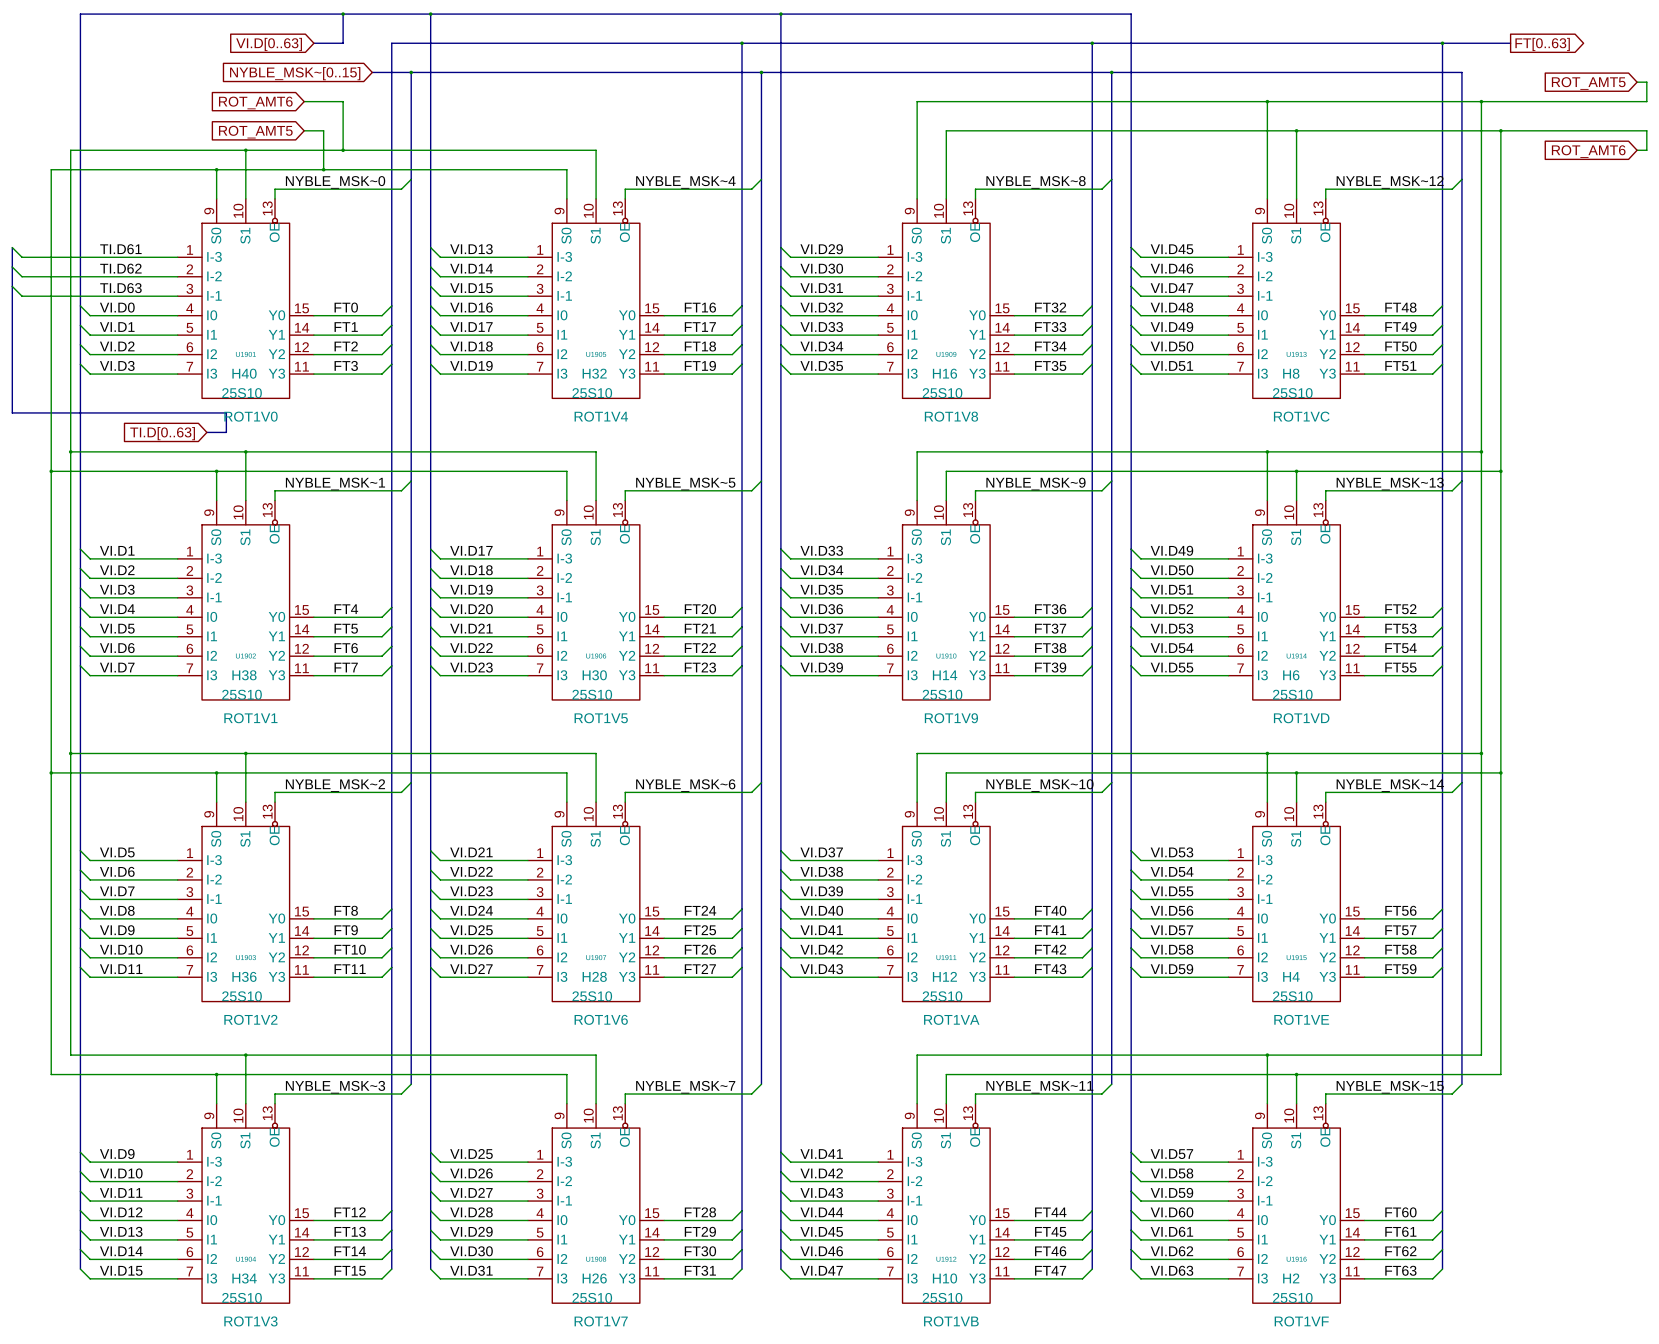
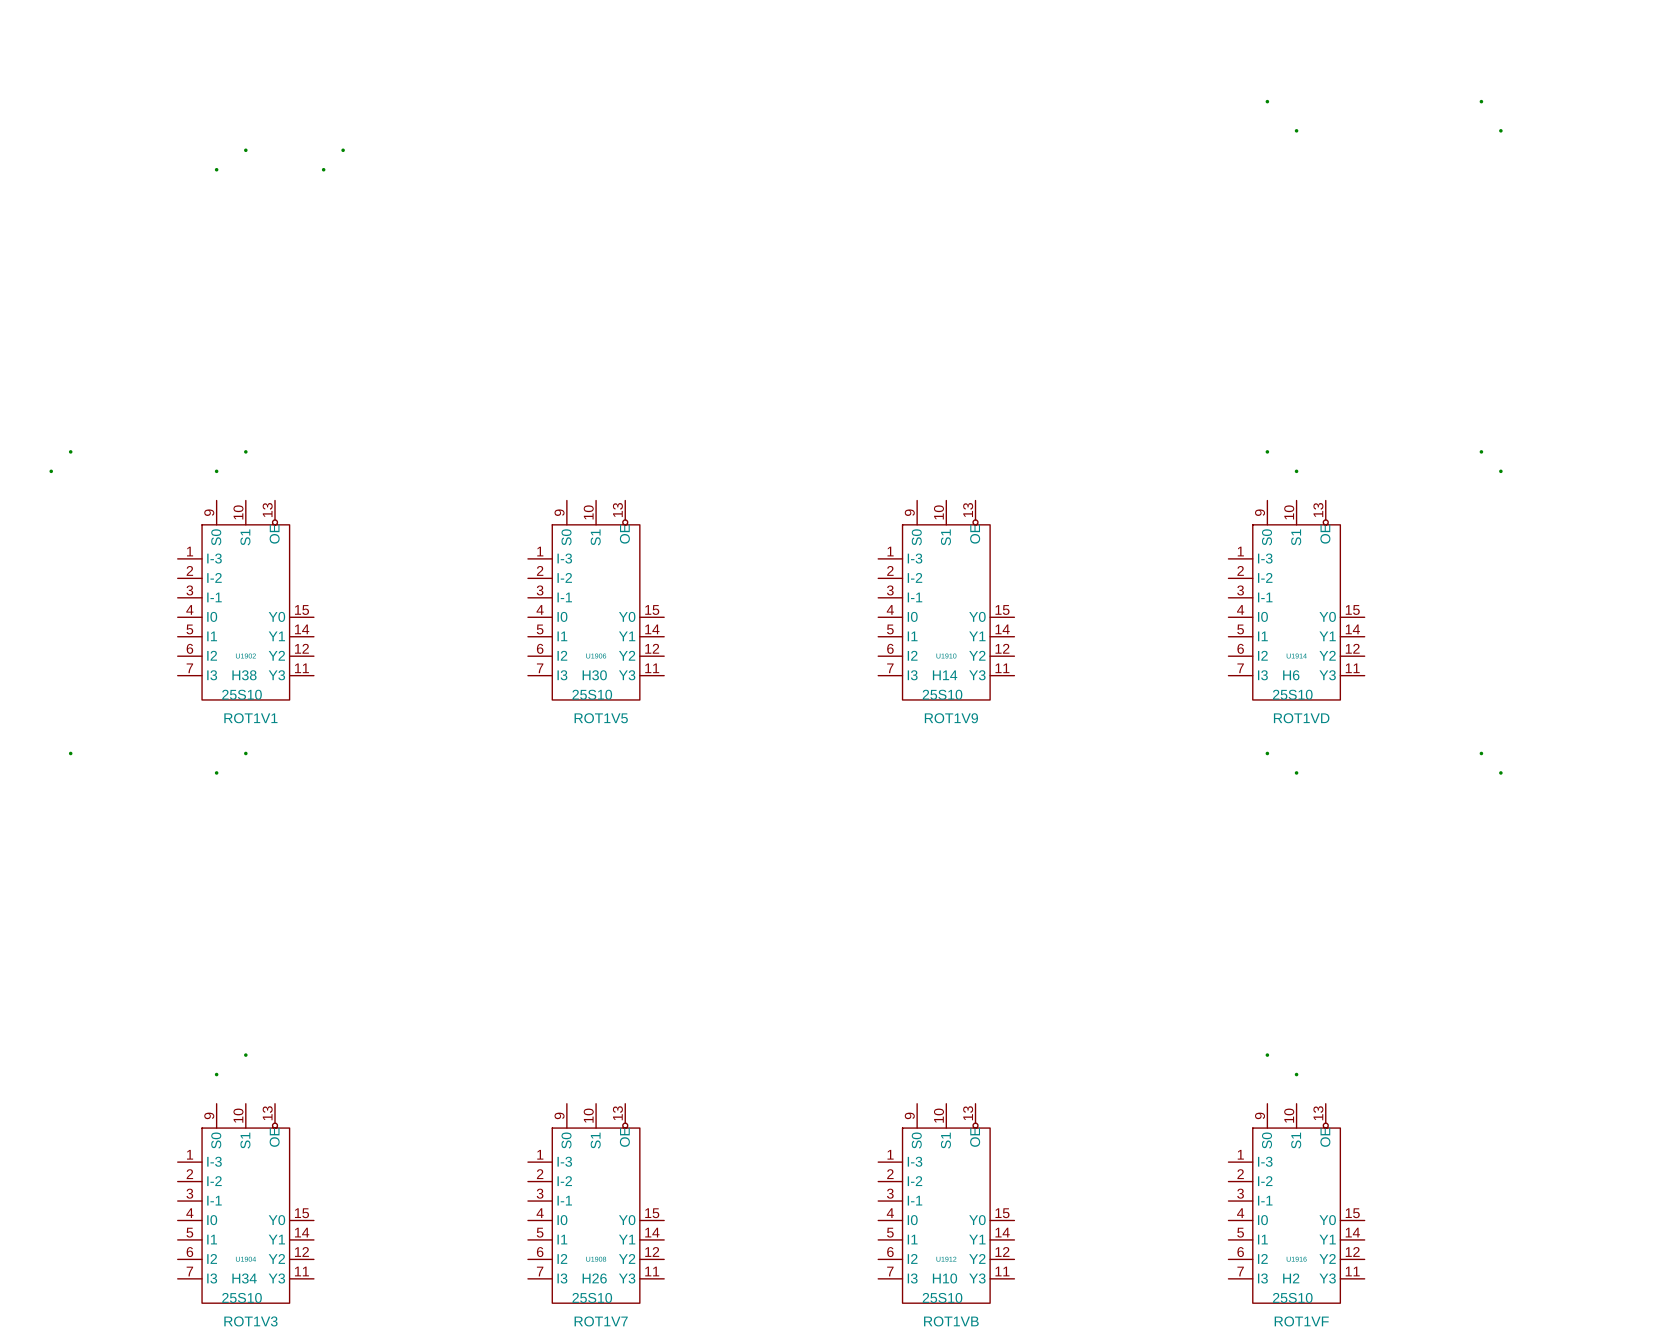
bus: (343, 14) (343, 43) (313, 43) -> none
junction: (343, 14) -> none
bus: (430, 14) (430, 1269) -> none
junction: (430, 14) -> none
bus: (780, 14) (780, 1269) -> none
junction: (780, 14) -> none
bus: (742, 43) (742, 1269) -> none
junction: (742, 43) -> none
bus: (1092, 43) (1092, 1269) -> none
junction: (1092, 43) -> none
bus: (1442, 43) (1442, 1269) -> none
junction: (1442, 43) -> none
bus: (1510, 43) (391, 43) (391, 1269) -> none
global label: VI.D[0..63] (269, 44) -> none
global label: FT[0..63] (1542, 44) -> none
bus: (372, 72) (1461, 72) (1461, 1084) -> none
bus: (411, 72) (411, 1084) -> none
junction: (411, 72) -> none
bus: (761, 72) (761, 1084) -> none
junction: (761, 72) -> none
bus: (1111, 72) (1111, 1084) -> none
junction: (1111, 72) -> none
global label: NYBLE_MSK~[0..15] (295, 73) -> none
wire: (1637, 82) (1646, 82) (1646, 101) (917, 101) (917, 198) -> none
global label: ROT_AMT5 (1588, 83) -> none
wire: (304, 101) (343, 101) (343, 150) -> none
wire: (1267, 101) (1267, 198) -> none
wire: (1481, 101) (1481, 1055) (917, 1055) (917, 1103) -> none
global label: ROT_AMT6 (255, 102) -> none
wire: (304, 130) (323, 130) (323, 169) -> none
wire: (1296, 130) (1296, 198) -> none
wire: (1500, 130) (1500, 1074) (946, 1074) (946, 1103) -> none
global label: ROT_AMT5 (255, 132) -> none
wire: (245, 150) (245, 198) -> none
wire: (1637, 150) (1646, 150) (1646, 130) (946, 130) (946, 198) -> none
global label: ROT_AMT6 (1588, 151) -> none
wire: (216, 169) (216, 198) -> none
wire: (411, 179) (401, 189) (275, 189) (275, 198) -> none
wire: (761, 179) (751, 189) (625, 189) (625, 198) -> none
wire: (1111, 179) (1101, 189) (975, 189) (975, 198) -> none
wire: (1461, 179) (1452, 189) (1325, 189) (1325, 198) -> none
label: NYBLE_MSK~0 (335, 182) -> none
label: NYBLE_MSK~4 (685, 182) -> none
label: NYBLE_MSK~8 (1036, 182) -> none
label: NYBLE_MSK~12 (1390, 182) -> none
wire: (566, 198) (566, 169) (51, 169) (51, 1074) (566, 1074) (566, 1103) -> none
wire: (596, 198) (596, 150) (70, 150) (70, 1055) (596, 1055) (596, 1103) -> none
bus: (12, 247) (12, 412) (226, 412) (226, 432) (206, 432) -> none
wire: (12, 247) (22, 257) (177, 257) -> none
wire: (430, 247) (440, 257) (527, 257) -> none
wire: (780, 247) (790, 257) (878, 257) -> none
wire: (1131, 247) (1140, 257) (1228, 257) -> none
label: TI.D61 (120, 249) -> none
label: VI.D13 (471, 249) -> none
label: VI.D29 (821, 249) -> none
label: VI.D45 (1171, 249) -> none
wire: (12, 267) (22, 276) (177, 276) -> none
wire: (430, 267) (440, 276) (527, 276) -> none
wire: (780, 267) (790, 276) (878, 276) -> none
wire: (1131, 267) (1140, 276) (1228, 276) -> none
label: TI.D62 (120, 268) -> none
label: VI.D14 (471, 268) -> none
label: VI.D30 (821, 268) -> none
label: VI.D46 (1171, 268) -> none
wire: (12, 286) (22, 296) (177, 296) -> none
wire: (430, 286) (440, 296) (527, 296) -> none
wire: (780, 286) (790, 296) (878, 296) -> none
wire: (1131, 286) (1140, 296) (1228, 296) -> none
label: TI.D63 (120, 288) -> none
label: VI.D15 (471, 288) -> none
label: VI.D31 (821, 288) -> none
label: VI.D47 (1171, 288) -> none
part: 25S10 (245, 298) -> none
part: 25S10 (596, 298) -> none
part: 25S10 (946, 298) -> none
part: 25S10 (1296, 298) -> none
wire: (80, 305) (90, 315) (177, 315) -> none
wire: (391, 305) (382, 315) (313, 315) -> none
wire: (430, 305) (440, 315) (527, 315) -> none
wire: (742, 305) (732, 315) (664, 315) -> none
wire: (780, 305) (790, 315) (878, 315) -> none
wire: (1092, 305) (1082, 315) (1014, 315) -> none
wire: (1131, 305) (1140, 315) (1228, 315) -> none
wire: (1442, 305) (1432, 315) (1364, 315) -> none
label: VI.D0 (117, 307) -> none
label: FT0 (346, 307) -> none
label: VI.D16 (471, 307) -> none
label: FT16 (700, 307) -> none
label: VI.D32 (821, 307) -> none
label: FT32 (1050, 307) -> none
label: VI.D48 (1171, 307) -> none
label: FT48 (1400, 307) -> none
wire: (80, 325) (90, 335) (177, 335) -> none
wire: (391, 325) (382, 335) (313, 335) -> none
wire: (430, 325) (440, 335) (527, 335) -> none
wire: (742, 325) (732, 335) (664, 335) -> none
wire: (780, 325) (790, 335) (878, 335) -> none
wire: (1092, 325) (1082, 335) (1014, 335) -> none
wire: (1131, 325) (1140, 335) (1228, 335) -> none
wire: (1442, 325) (1432, 335) (1364, 335) -> none
label: VI.D1 (117, 327) -> none
label: FT1 (346, 327) -> none
label: VI.D17 (471, 327) -> none
label: FT17 (700, 327) -> none
label: VI.D33 (821, 327) -> none
label: FT33 (1050, 327) -> none
label: VI.D49 (1171, 327) -> none
label: FT49 (1400, 327) -> none
wire: (80, 344) (90, 354) (177, 354) -> none
wire: (391, 344) (382, 354) (313, 354) -> none
wire: (430, 344) (440, 354) (527, 354) -> none
wire: (742, 344) (732, 354) (664, 354) -> none
wire: (780, 344) (790, 354) (878, 354) -> none
wire: (1092, 344) (1082, 354) (1014, 354) -> none
wire: (1131, 344) (1140, 354) (1228, 354) -> none
wire: (1442, 344) (1432, 354) (1364, 354) -> none
label: VI.D2 (117, 346) -> none
label: FT2 (346, 346) -> none
label: VI.D18 (471, 346) -> none
label: FT18 (700, 346) -> none
label: VI.D34 (821, 346) -> none
label: FT34 (1050, 346) -> none
label: VI.D50 (1172, 346) -> none
label: FT50 (1400, 346) -> none
wire: (80, 364) (90, 374) (177, 374) -> none
wire: (391, 364) (382, 374) (313, 374) -> none
wire: (430, 364) (440, 374) (527, 374) -> none
wire: (742, 364) (732, 374) (664, 374) -> none
wire: (780, 364) (790, 374) (878, 374) -> none
wire: (1092, 364) (1082, 374) (1014, 374) -> none
wire: (1131, 364) (1140, 374) (1228, 374) -> none
wire: (1442, 364) (1432, 374) (1364, 374) -> none
label: VI.D3 (117, 365) -> none
label: FT3 (346, 365) -> none
label: VI.D19 (471, 365) -> none
label: FT19 (700, 365) -> none
label: VI.D35 (821, 365) -> none
label: FT35 (1050, 365) -> none
label: VI.D51 (1171, 366) -> none
label: FT51 (1400, 366) -> none
global label: TI.D[0..63] (162, 433) -> none
wire: (70, 451) (596, 451) (596, 500) -> none
wire: (245, 451) (245, 500) -> none
wire: (1267, 451) (1267, 500) -> none
wire: (1481, 451) (917, 451) (917, 500) -> none
wire: (51, 471) (566, 471) (566, 500) -> none
wire: (216, 471) (216, 500) -> none
wire: (1296, 471) (1296, 500) -> none
wire: (1500, 471) (946, 471) (946, 500) -> none
wire: (411, 481) (401, 490) (275, 490) (275, 500) -> none
wire: (761, 481) (751, 490) (625, 490) (625, 500) -> none
wire: (1111, 481) (1101, 490) (975, 490) (975, 500) -> none
wire: (1461, 481) (1452, 490) (1325, 490) (1325, 500) -> none
label: NYBLE_MSK~1 (335, 484) -> none
label: NYBLE_MSK~5 (685, 484) -> none
label: NYBLE_MSK~9 (1035, 484) -> none
label: NYBLE_MSK~13 (1390, 484) -> none
wire: (80, 549) (90, 558) (177, 558) -> none
wire: (430, 549) (440, 558) (527, 558) -> none
wire: (780, 549) (790, 558) (878, 558) -> none
wire: (1131, 549) (1140, 558) (1228, 558) -> none
label: VI.D1 (117, 550) -> none
label: VI.D17 (471, 550) -> none
label: VI.D33 (821, 550) -> none
label: VI.D49 (1171, 550) -> none
wire: (80, 568) (90, 578) (177, 578) -> none
wire: (430, 568) (440, 578) (527, 578) -> none
wire: (780, 568) (790, 578) (878, 578) -> none
wire: (1131, 568) (1140, 578) (1228, 578) -> none
label: VI.D2 (117, 570) -> none
label: VI.D18 (471, 570) -> none
label: VI.D34 (821, 570) -> none
label: VI.D50 (1172, 570) -> none
wire: (80, 588) (90, 597) (177, 597) -> none
wire: (430, 588) (440, 597) (527, 597) -> none
wire: (780, 588) (790, 597) (878, 597) -> none
wire: (1131, 588) (1140, 597) (1228, 597) -> none
label: VI.D3 (117, 589) -> none
label: VI.D19 (471, 589) -> none
label: VI.D35 (821, 589) -> none
label: VI.D51 (1171, 589) -> none
wire: (80, 607) (90, 617) (177, 617) -> none
wire: (391, 607) (382, 617) (313, 617) -> none
wire: (430, 607) (440, 617) (527, 617) -> none
wire: (742, 607) (732, 617) (664, 617) -> none
wire: (780, 607) (790, 617) (878, 617) -> none
wire: (1092, 607) (1082, 617) (1014, 617) -> none
wire: (1131, 607) (1140, 617) (1228, 617) -> none
wire: (1442, 607) (1432, 617) (1364, 617) -> none
label: VI.D4 (117, 609) -> none
label: FT4 (346, 609) -> none
label: VI.D20 (471, 609) -> none
label: FT20 (700, 609) -> none
label: VI.D36 (821, 609) -> none
label: FT36 (1050, 609) -> none
label: VI.D52 (1171, 609) -> none
label: FT52 (1400, 609) -> none
wire: (80, 627) (90, 636) (177, 636) -> none
wire: (391, 627) (382, 636) (313, 636) -> none
wire: (430, 627) (440, 636) (527, 636) -> none
wire: (742, 627) (732, 636) (664, 636) -> none
wire: (780, 627) (790, 636) (878, 636) -> none
wire: (1092, 627) (1082, 636) (1014, 636) -> none
wire: (1131, 627) (1140, 636) (1228, 636) -> none
wire: (1442, 627) (1432, 636) (1364, 636) -> none
label: VI.D5 (117, 628) -> none
label: FT5 (346, 628) -> none
label: VI.D21 (471, 628) -> none
label: FT21 (700, 628) -> none
label: VI.D37 (821, 628) -> none
label: FT37 (1050, 628) -> none
label: VI.D53 (1171, 628) -> none
label: FT53 (1400, 628) -> none
wire: (80, 646) (90, 656) (177, 656) -> none
wire: (391, 646) (382, 656) (313, 656) -> none
wire: (430, 646) (440, 656) (527, 656) -> none
wire: (742, 646) (732, 656) (664, 656) -> none
wire: (780, 646) (790, 656) (878, 656) -> none
wire: (1092, 646) (1082, 656) (1014, 656) -> none
wire: (1131, 646) (1140, 656) (1228, 656) -> none
wire: (1442, 646) (1432, 656) (1364, 656) -> none
label: VI.D6 (117, 648) -> none
label: FT6 (346, 648) -> none
label: VI.D22 (471, 648) -> none
label: FT22 (700, 648) -> none
label: VI.D38 (821, 648) -> none
label: FT38 (1050, 648) -> none
label: VI.D54 (1172, 648) -> none
label: FT54 (1401, 648) -> none
wire: (80, 665) (90, 675) (177, 675) -> none
wire: (391, 665) (382, 675) (313, 675) -> none
wire: (430, 665) (440, 675) (527, 675) -> none
wire: (742, 665) (732, 675) (664, 675) -> none
wire: (780, 665) (790, 675) (878, 675) -> none
wire: (1092, 665) (1082, 675) (1014, 675) -> none
wire: (1131, 665) (1140, 675) (1228, 675) -> none
wire: (1442, 665) (1432, 675) (1364, 675) -> none
label: VI.D7 (117, 667) -> none
label: FT7 (346, 667) -> none
label: VI.D23 (471, 667) -> none
label: FT23 (700, 667) -> none
label: VI.D39 (821, 667) -> none
label: FT39 (1050, 667) -> none
label: VI.D55 (1171, 667) -> none
label: FT55 (1400, 667) -> none
wire: (70, 753) (596, 753) (596, 802) -> none
wire: (245, 753) (245, 802) -> none
wire: (1267, 753) (1267, 802) -> none
wire: (1481, 753) (917, 753) (917, 802) -> none
wire: (51, 772) (566, 772) (566, 802) -> none
junction: (51, 772) -> none
wire: (216, 772) (216, 802) -> none
wire: (1296, 772) (1296, 802) -> none
wire: (1500, 772) (946, 772) (946, 802) -> none
wire: (411, 782) (401, 792) (275, 792) (275, 802) -> none
wire: (761, 782) (751, 792) (625, 792) (625, 802) -> none
wire: (1111, 782) (1101, 792) (975, 792) (975, 802) -> none
wire: (1461, 782) (1452, 792) (1325, 792) (1325, 802) -> none
label: NYBLE_MSK~2 (335, 785) -> none
label: NYBLE_MSK~6 (685, 785) -> none
label: NYBLE_MSK~10 (1039, 785) -> none
label: NYBLE_MSK~14 (1390, 785) -> none
wire: (80, 850) (90, 860) (177, 860) -> none
wire: (430, 850) (440, 860) (527, 860) -> none
wire: (780, 850) (790, 860) (878, 860) -> none
wire: (1131, 850) (1140, 860) (1228, 860) -> none
label: VI.D5 (117, 852) -> none
label: VI.D21 (471, 852) -> none
label: VI.D37 (821, 852) -> none
label: VI.D53 (1171, 852) -> none
wire: (80, 870) (90, 879) (177, 879) -> none
wire: (430, 870) (440, 879) (527, 879) -> none
wire: (780, 870) (790, 879) (878, 879) -> none
wire: (1131, 870) (1140, 879) (1228, 879) -> none
label: VI.D6 (117, 871) -> none
label: VI.D22 (471, 871) -> none
label: VI.D38 (821, 871) -> none
label: VI.D54 (1172, 871) -> none
wire: (80, 889) (90, 899) (177, 899) -> none
wire: (430, 889) (440, 899) (527, 899) -> none
wire: (780, 889) (790, 899) (878, 899) -> none
wire: (1131, 889) (1140, 899) (1228, 899) -> none
label: VI.D7 (117, 891) -> none
label: VI.D23 (471, 891) -> none
label: VI.D39 (821, 891) -> none
label: VI.D55 (1171, 891) -> none
part: 25S10 (245, 901) -> none
part: 25S10 (596, 901) -> none
part: 25S10 (946, 901) -> none
part: 25S10 (1296, 901) -> none
wire: (80, 909) (90, 918) (177, 918) -> none
wire: (391, 909) (382, 918) (313, 918) -> none
wire: (430, 909) (440, 918) (527, 918) -> none
wire: (742, 909) (732, 918) (664, 918) -> none
wire: (780, 909) (790, 918) (878, 918) -> none
wire: (1092, 909) (1082, 918) (1014, 918) -> none
wire: (1131, 909) (1140, 918) (1228, 918) -> none
wire: (1442, 909) (1432, 918) (1364, 918) -> none
label: VI.D8 (117, 910) -> none
label: FT8 (346, 910) -> none
label: VI.D24 (471, 910) -> none
label: FT24 (700, 910) -> none
label: VI.D40 (821, 910) -> none
label: FT40 (1050, 910) -> none
label: VI.D56 (1171, 910) -> none
label: FT56 (1400, 910) -> none
wire: (80, 928) (90, 938) (177, 938) -> none
wire: (391, 928) (382, 938) (313, 938) -> none
wire: (430, 928) (440, 938) (527, 938) -> none
wire: (742, 928) (732, 938) (664, 938) -> none
wire: (780, 928) (790, 938) (878, 938) -> none
wire: (1092, 928) (1082, 938) (1014, 938) -> none
wire: (1131, 928) (1140, 938) (1228, 938) -> none
wire: (1442, 928) (1432, 938) (1364, 938) -> none
label: VI.D9 (117, 930) -> none
label: FT9 (346, 930) -> none
label: VI.D25 (471, 930) -> none
label: FT25 (700, 930) -> none
label: VI.D41 (821, 930) -> none
label: FT41 (1050, 930) -> none
label: VI.D57 (1171, 930) -> none
label: FT57 (1400, 930) -> none
wire: (80, 948) (90, 957) (177, 957) -> none
wire: (391, 948) (382, 957) (313, 957) -> none
wire: (430, 948) (440, 957) (527, 957) -> none
wire: (742, 948) (732, 957) (664, 957) -> none
wire: (780, 948) (790, 957) (878, 957) -> none
wire: (1092, 948) (1082, 957) (1014, 957) -> none
wire: (1131, 948) (1140, 957) (1228, 957) -> none
wire: (1442, 948) (1432, 957) (1364, 957) -> none
label: VI.D10 (121, 949) -> none
label: FT10 (350, 949) -> none
label: VI.D26 (471, 949) -> none
label: FT26 (700, 949) -> none
label: VI.D42 (821, 949) -> none
label: FT42 (1050, 949) -> none
label: VI.D58 (1171, 949) -> none
label: FT58 (1400, 949) -> none
wire: (80, 967) (90, 977) (177, 977) -> none
wire: (391, 967) (382, 977) (313, 977) -> none
wire: (430, 967) (440, 977) (527, 977) -> none
wire: (742, 967) (732, 977) (664, 977) -> none
wire: (780, 967) (790, 977) (878, 977) -> none
wire: (1092, 967) (1082, 977) (1014, 977) -> none
wire: (1131, 967) (1140, 977) (1228, 977) -> none
wire: (1442, 967) (1432, 977) (1364, 977) -> none
label: VI.D11 (121, 969) -> none
label: FT11 (350, 969) -> none
label: VI.D27 (471, 969) -> none
label: FT27 (700, 969) -> none
label: VI.D43 (821, 969) -> none
label: FT43 (1050, 969) -> none
label: VI.D59 (1171, 969) -> none
label: FT59 (1400, 969) -> none
wire: (245, 1055) (245, 1103) -> none
wire: (1267, 1055) (1267, 1103) -> none
wire: (216, 1074) (216, 1103) -> none
wire: (1296, 1074) (1296, 1103) -> none
wire: (411, 1084) (401, 1094) (275, 1094) (275, 1103) -> none
wire: (761, 1084) (751, 1094) (625, 1094) (625, 1103) -> none
wire: (1111, 1084) (1101, 1094) (975, 1094) (975, 1103) -> none
wire: (1461, 1084) (1452, 1094) (1325, 1094) (1325, 1103) -> none
label: NYBLE_MSK~3 (335, 1087) -> none
label: NYBLE_MSK~7 (685, 1087) -> none
label: NYBLE_MSK~11 (1039, 1087) -> none
label: NYBLE_MSK~15 (1390, 1087) -> none
wire: (80, 1152) (90, 1162) (177, 1162) -> none
wire: (430, 1152) (440, 1162) (527, 1162) -> none
wire: (780, 1152) (790, 1162) (878, 1162) -> none
wire: (1131, 1152) (1140, 1162) (1228, 1162) -> none
label: VI.D9 (117, 1154) -> none
label: VI.D25 (471, 1154) -> none
label: VI.D41 (821, 1154) -> none
label: VI.D57 (1171, 1154) -> none
wire: (80, 1171) (90, 1181) (177, 1181) -> none
wire: (430, 1171) (440, 1181) (527, 1181) -> none
wire: (780, 1171) (790, 1181) (878, 1181) -> none
wire: (1131, 1171) (1140, 1181) (1228, 1181) -> none
label: VI.D10 (121, 1173) -> none
label: VI.D26 (471, 1173) -> none
label: VI.D42 (821, 1173) -> none
label: VI.D58 (1171, 1173) -> none
wire: (80, 1191) (90, 1201) (177, 1201) -> none
wire: (430, 1191) (440, 1201) (527, 1201) -> none
wire: (780, 1191) (790, 1201) (878, 1201) -> none
wire: (1131, 1191) (1140, 1201) (1228, 1201) -> none
label: VI.D11 (121, 1192) -> none
label: VI.D27 (471, 1192) -> none
label: VI.D43 (821, 1192) -> none
label: VI.D59 (1171, 1192) -> none
wire: (80, 1210) (90, 1220) (177, 1220) -> none
wire: (391, 1210) (382, 1220) (313, 1220) -> none
wire: (430, 1210) (440, 1220) (527, 1220) -> none
wire: (742, 1210) (732, 1220) (664, 1220) -> none
wire: (780, 1210) (790, 1220) (878, 1220) -> none
wire: (1092, 1210) (1082, 1220) (1014, 1220) -> none
wire: (1131, 1210) (1140, 1220) (1228, 1220) -> none
wire: (1442, 1210) (1432, 1220) (1364, 1220) -> none
label: VI.D12 (121, 1212) -> none
label: FT12 (350, 1212) -> none
label: VI.D28 (471, 1212) -> none
label: FT28 (700, 1212) -> none
label: VI.D44 (821, 1212) -> none
label: FT44 (1050, 1212) -> none
label: VI.D60 (1172, 1212) -> none
label: FT60 (1400, 1212) -> none
wire: (80, 1230) (90, 1239) (177, 1239) -> none
wire: (391, 1230) (382, 1239) (313, 1239) -> none
wire: (430, 1230) (440, 1239) (527, 1239) -> none
wire: (742, 1230) (732, 1239) (664, 1239) -> none
wire: (780, 1230) (790, 1239) (878, 1239) -> none
wire: (1092, 1230) (1082, 1239) (1014, 1239) -> none
wire: (1131, 1230) (1140, 1239) (1228, 1239) -> none
wire: (1442, 1230) (1432, 1239) (1364, 1239) -> none
label: VI.D13 (121, 1231) -> none
label: FT13 (350, 1231) -> none
label: VI.D29 (471, 1231) -> none
label: FT29 (700, 1231) -> none
label: VI.D45 (821, 1231) -> none
label: FT45 (1050, 1231) -> none
label: VI.D61 (1171, 1231) -> none
label: FT61 (1400, 1231) -> none
wire: (80, 1249) (90, 1259) (177, 1259) -> none
wire: (391, 1249) (382, 1259) (313, 1259) -> none
wire: (430, 1249) (440, 1259) (527, 1259) -> none
wire: (742, 1249) (732, 1259) (664, 1259) -> none
wire: (780, 1249) (790, 1259) (878, 1259) -> none
wire: (1092, 1249) (1082, 1259) (1014, 1259) -> none
wire: (1131, 1249) (1140, 1259) (1228, 1259) -> none
wire: (1442, 1249) (1432, 1259) (1364, 1259) -> none
label: VI.D14 (121, 1251) -> none
label: FT14 (350, 1251) -> none
label: VI.D30 (471, 1251) -> none
label: FT30 (700, 1251) -> none
label: VI.D46 (821, 1251) -> none
label: FT46 (1050, 1251) -> none
label: VI.D62 (1171, 1251) -> none
label: FT62 (1400, 1251) -> none
bus: (80, 1269) (80, 14) (1131, 14) (1131, 1269) -> none
wire: (80, 1269) (90, 1278) (177, 1278) -> none
wire: (391, 1269) (382, 1278) (313, 1278) -> none
wire: (430, 1269) (440, 1278) (527, 1278) -> none
wire: (742, 1269) (732, 1278) (664, 1278) -> none
wire: (780, 1269) (790, 1278) (878, 1278) -> none
wire: (1092, 1269) (1082, 1278) (1014, 1278) -> none
wire: (1131, 1269) (1140, 1278) (1228, 1278) -> none
wire: (1442, 1269) (1432, 1278) (1364, 1278) -> none
label: VI.D15 (121, 1270) -> none
label: FT15 (350, 1270) -> none
label: VI.D31 (471, 1270) -> none
label: FT31 (700, 1270) -> none
label: VI.D47 (821, 1270) -> none
label: FT47 (1050, 1270) -> none
label: VI.D63 (1171, 1270) -> none
label: FT63 (1400, 1270) -> none

